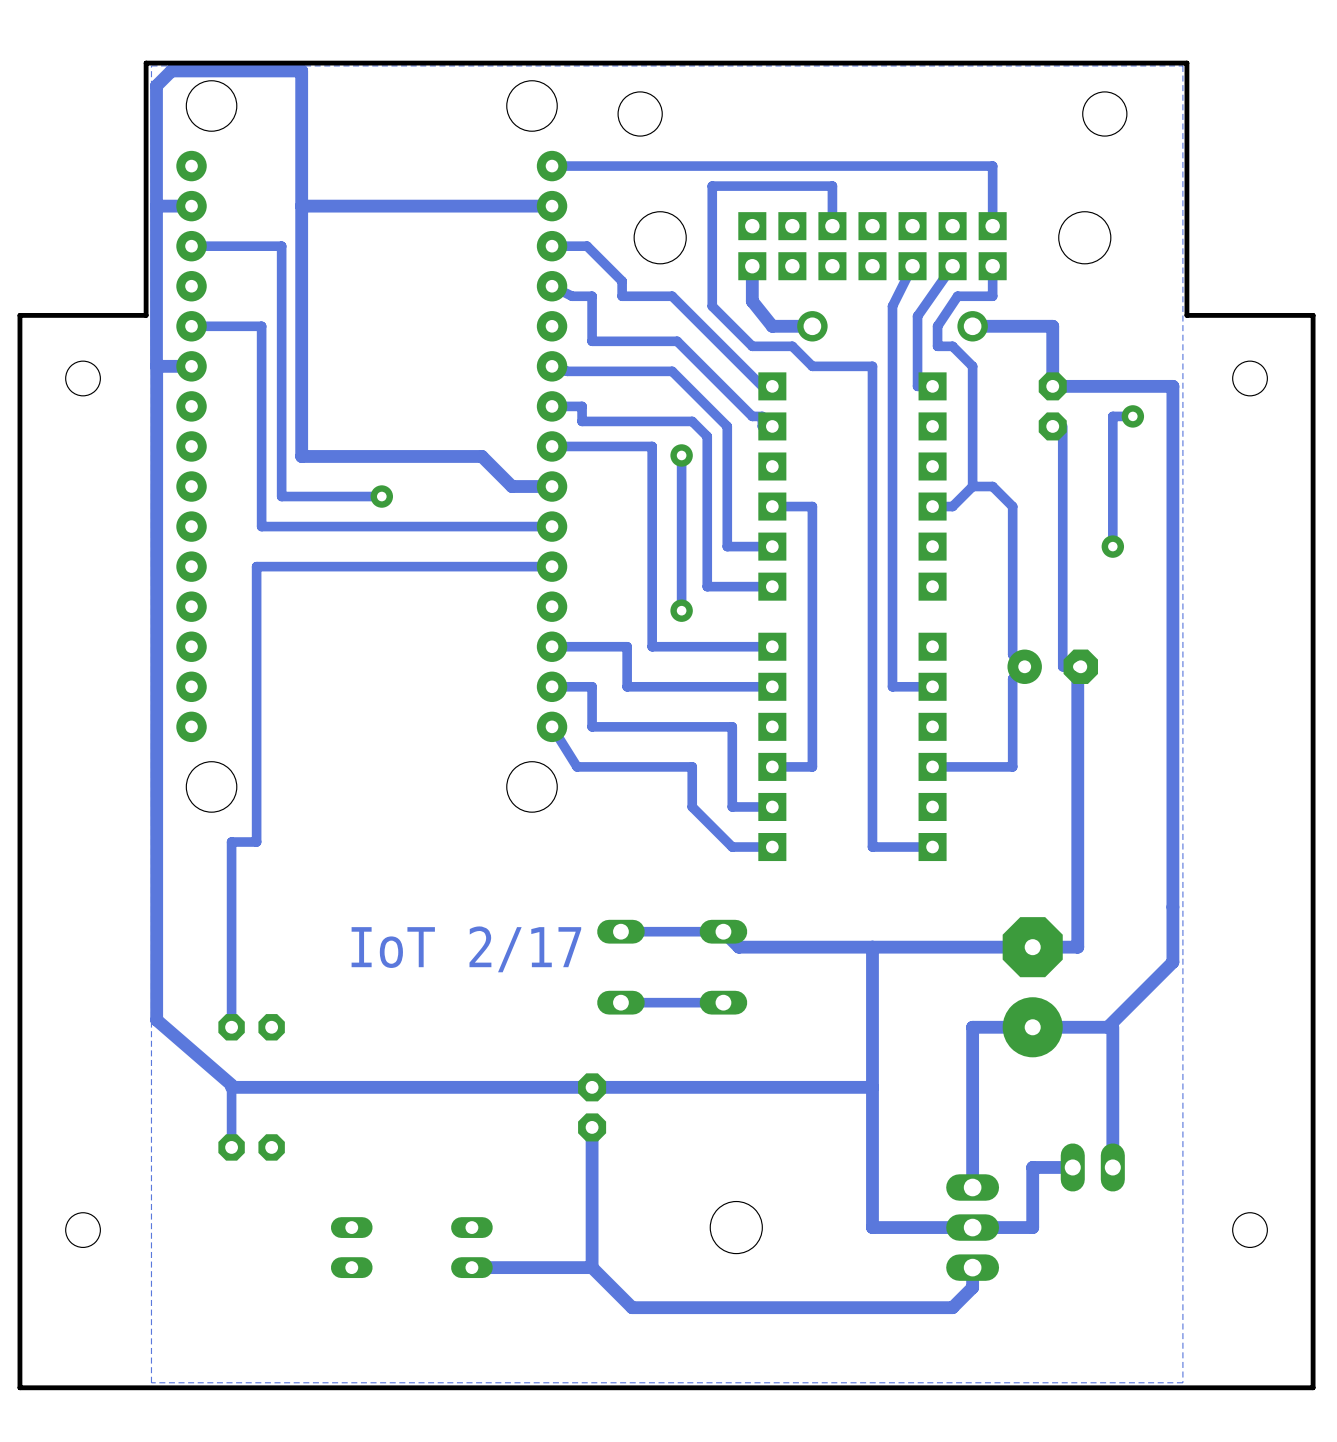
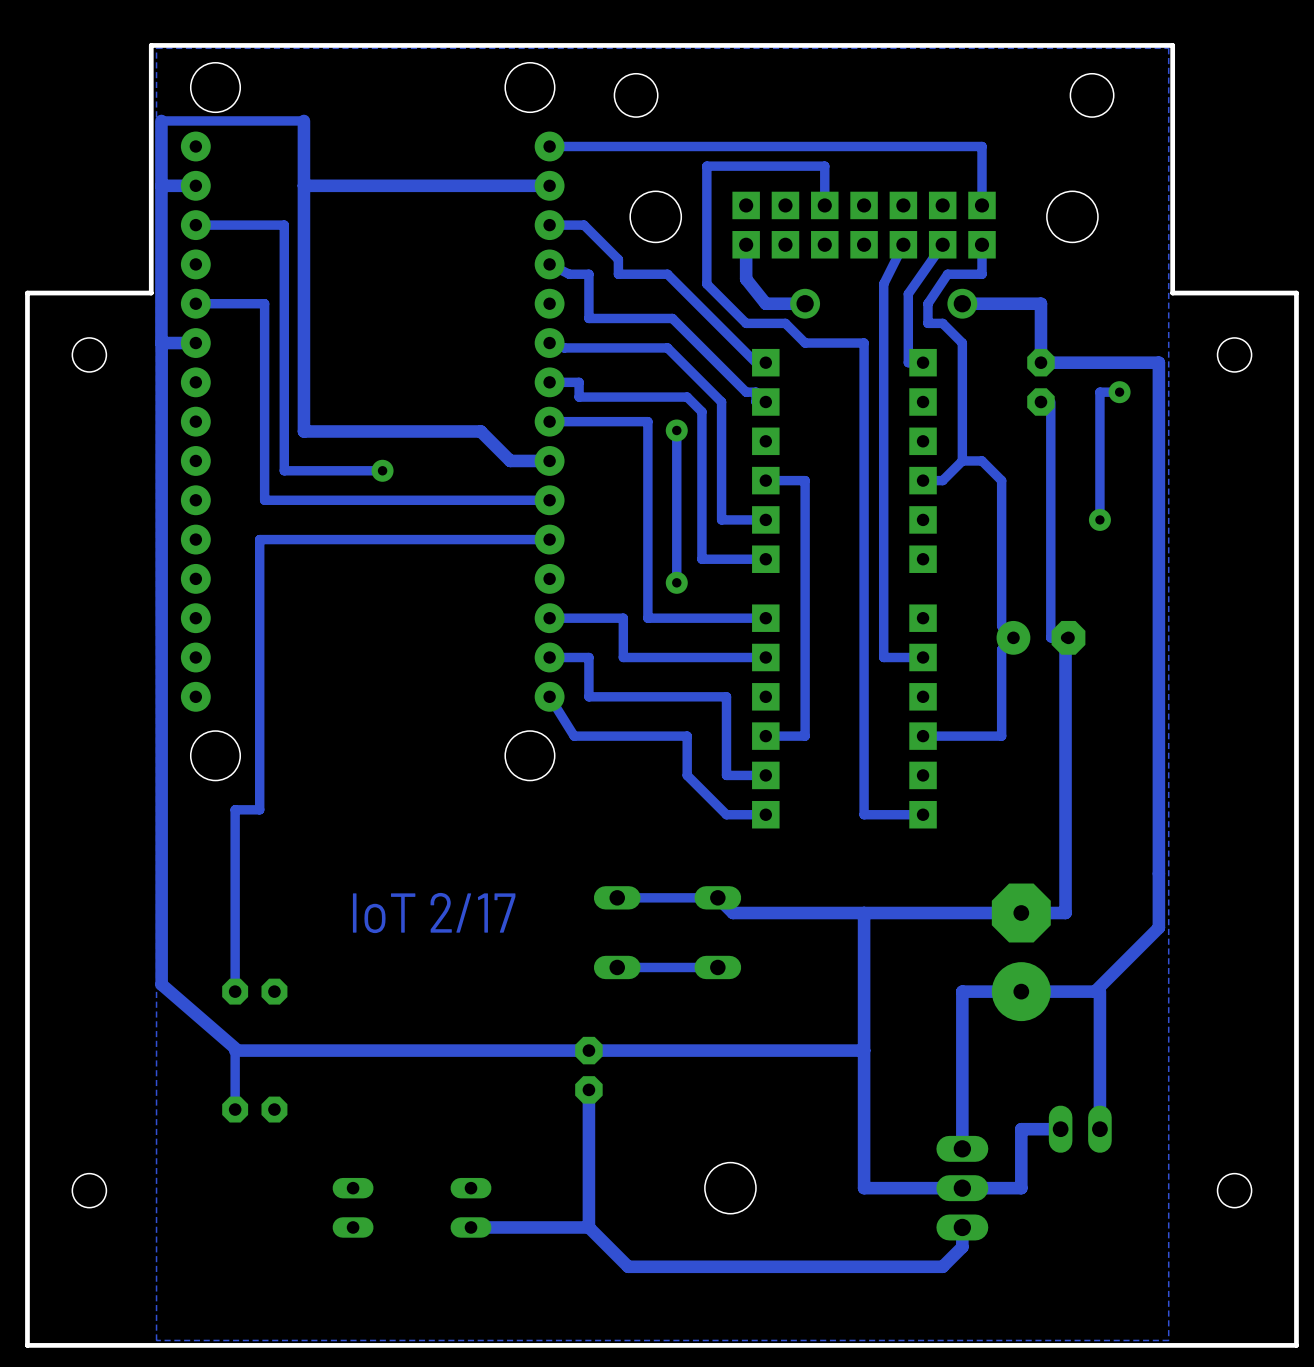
track: (301, 140) (301, 70) (171, 70) (156, 85) (156, 140) -> (303, 120) (161, 120)

